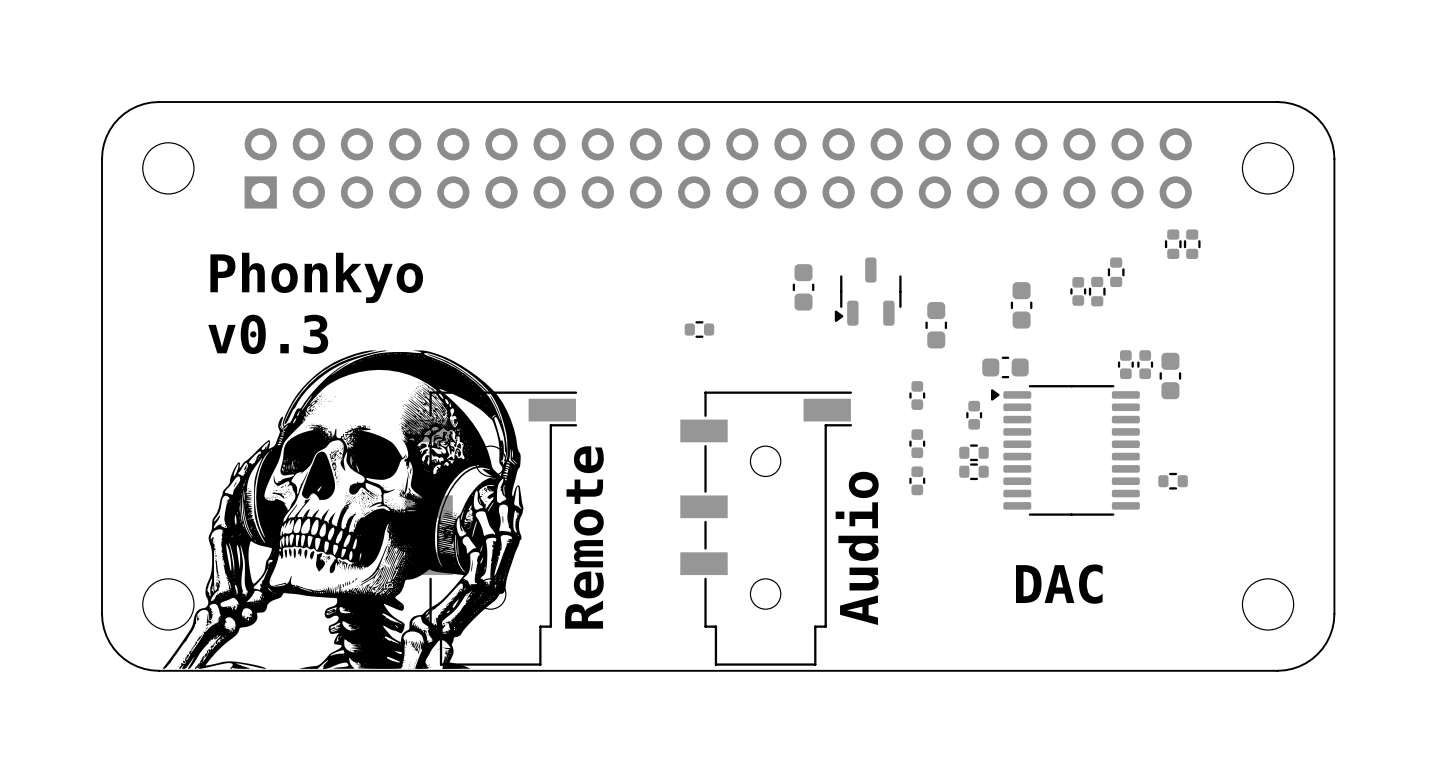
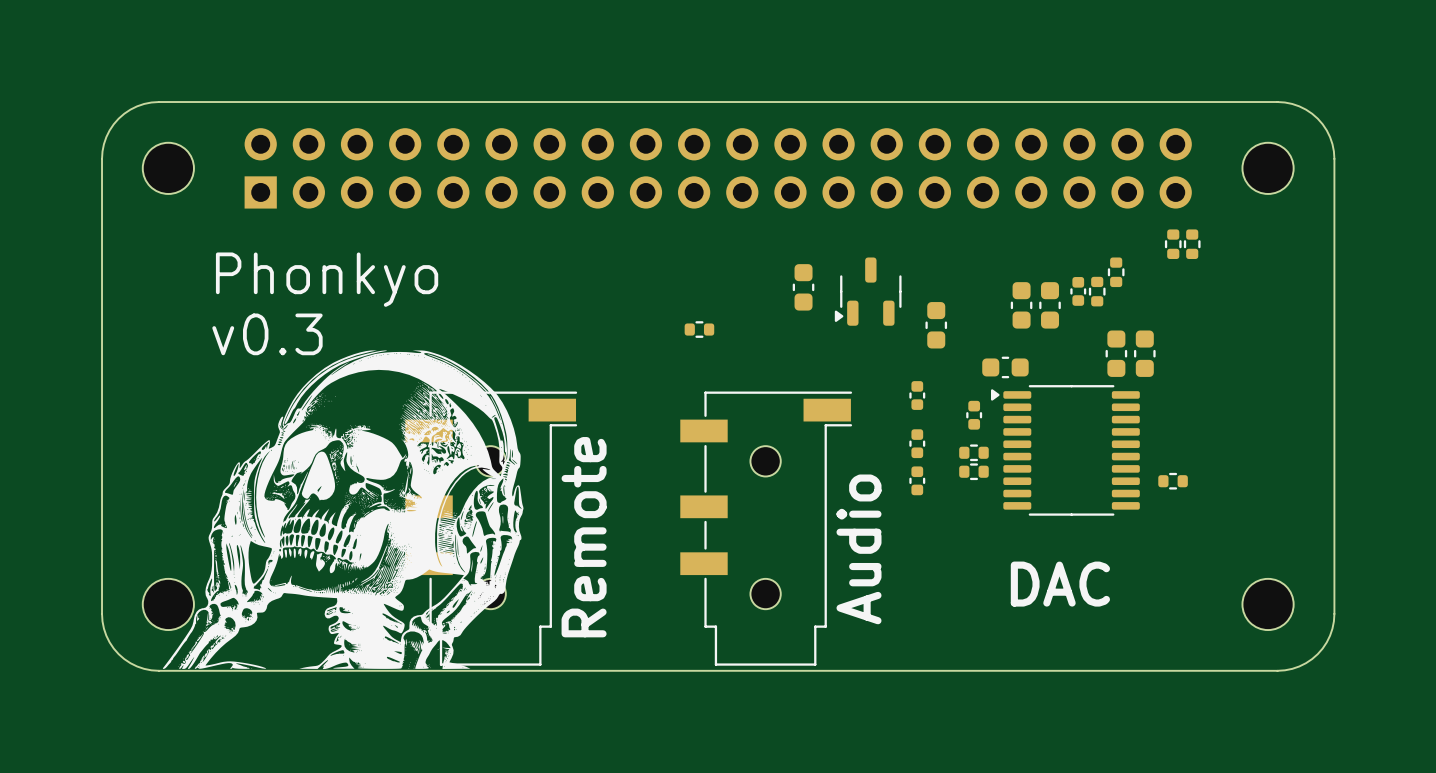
part: none -> (1050, 305)
part: none -> (1116, 353)
part: none -> (1144, 353)
part: (1125, 364) -> none
part: (1145, 364) -> none
part: (1170, 375) -> none

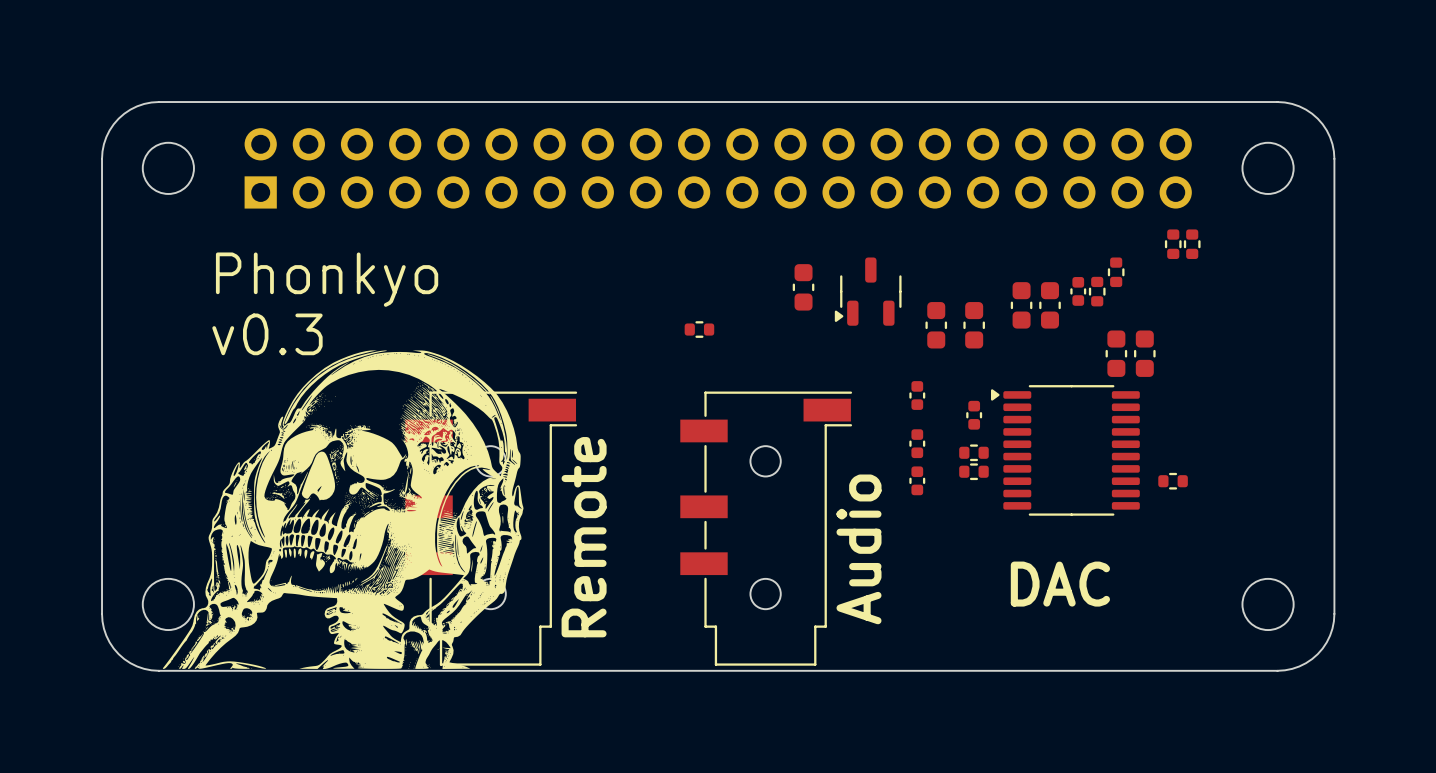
part rotation: 0° (1005, 367) -> 90° clockwise (974, 325)
part position: (1005, 367) -> (974, 325)

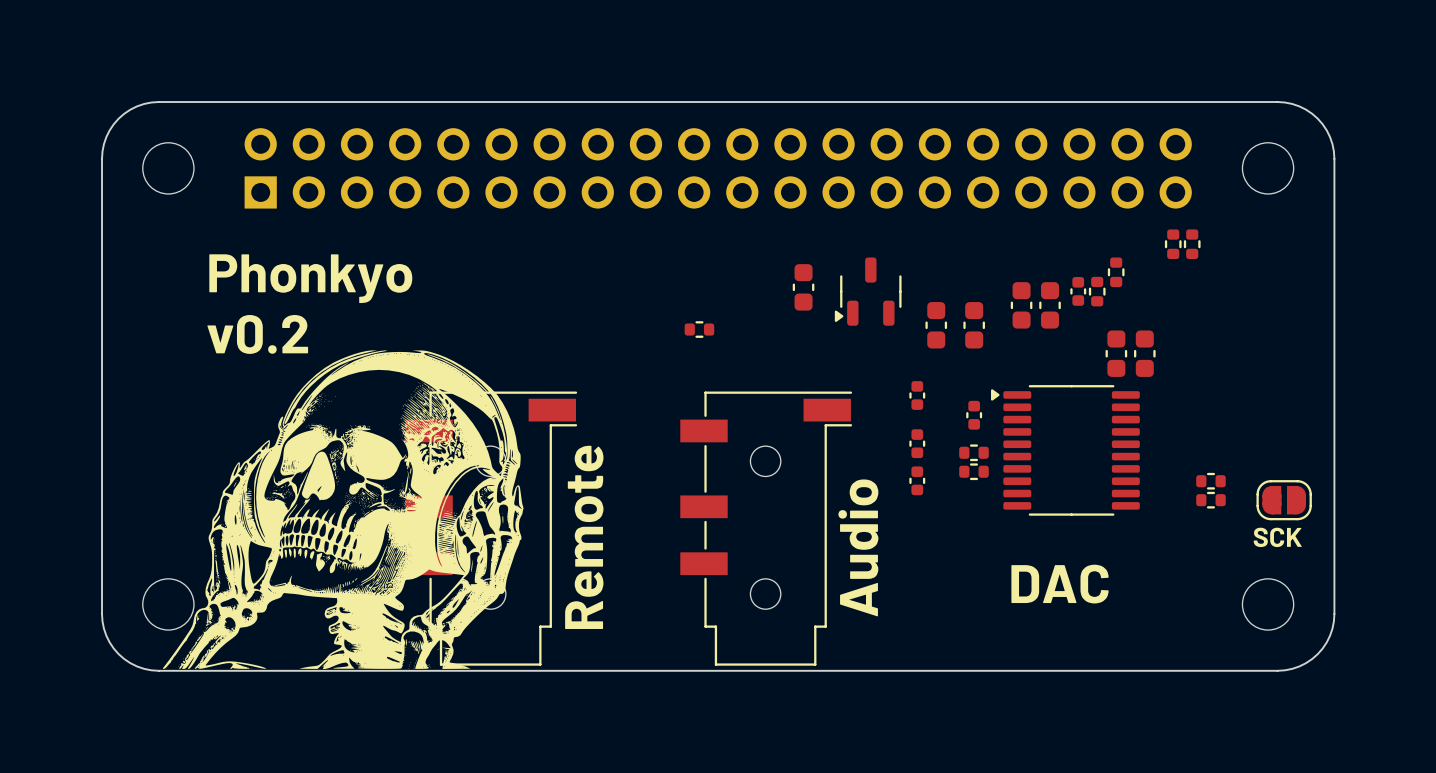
text: v0.3 (267, 334) -> v0.2 (257, 334)
part: (1173, 481) -> none
part: none -> (1210, 481)
part: none -> (1210, 500)
part: none -> (1284, 500)
text: none -> SCK (1277, 537)

